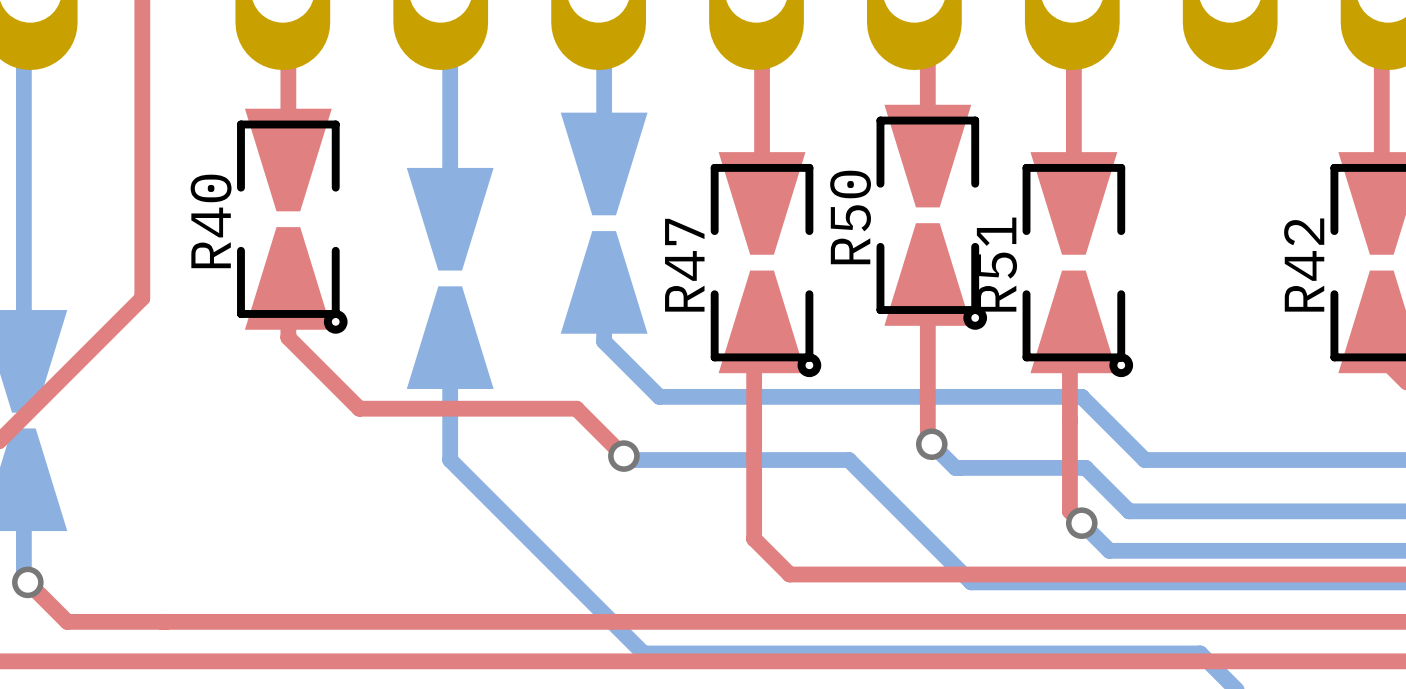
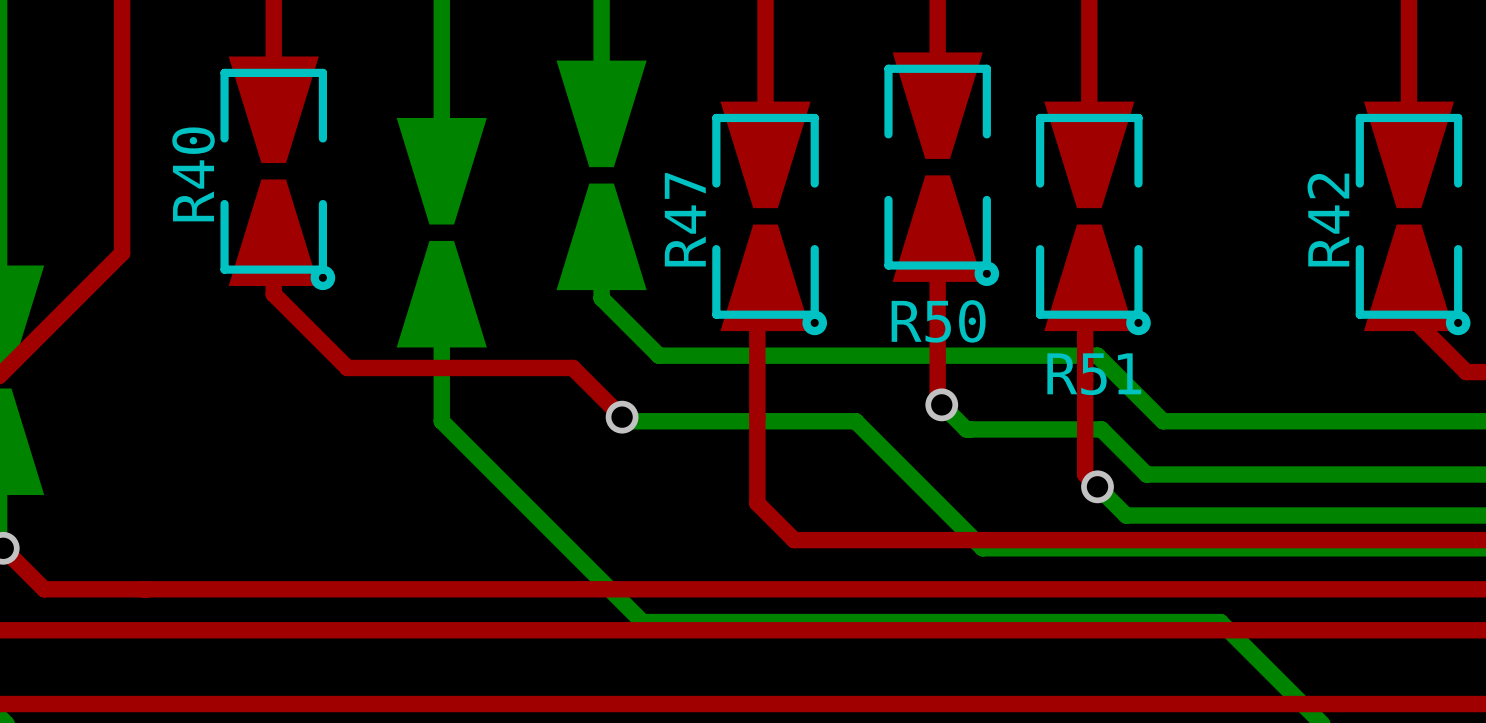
R50 name rotation: 0° (850, 217) -> 90° clockwise (938, 321)
R50 name position: R50 (850, 217) -> R50 (938, 321)
R51 name rotation: 0° (996, 264) -> 90° clockwise (1094, 374)
R51 name position: R51 (996, 264) -> R51 (1094, 374)

